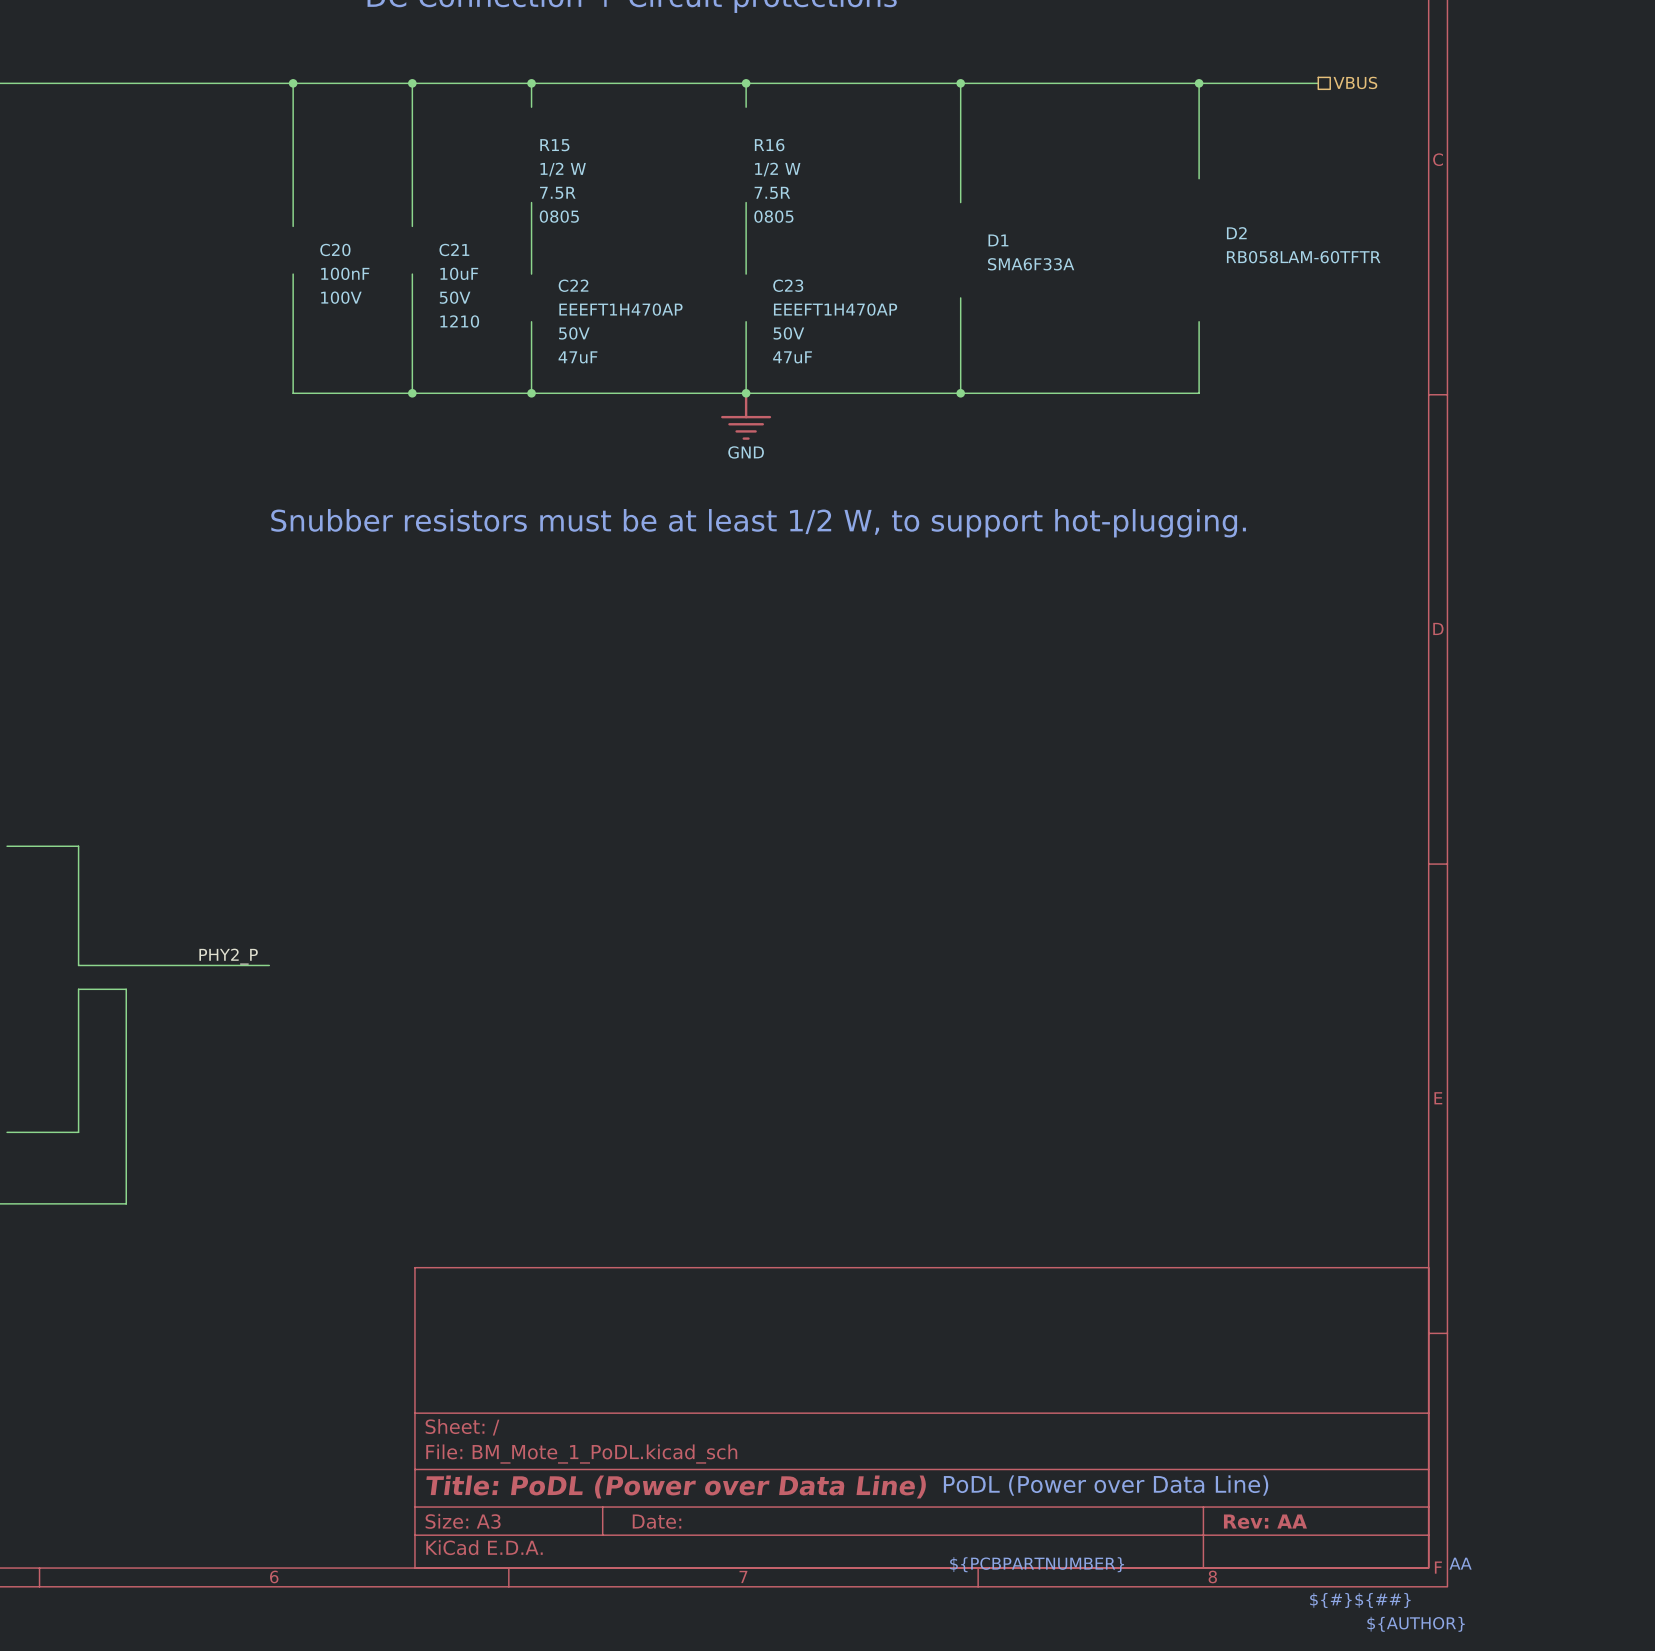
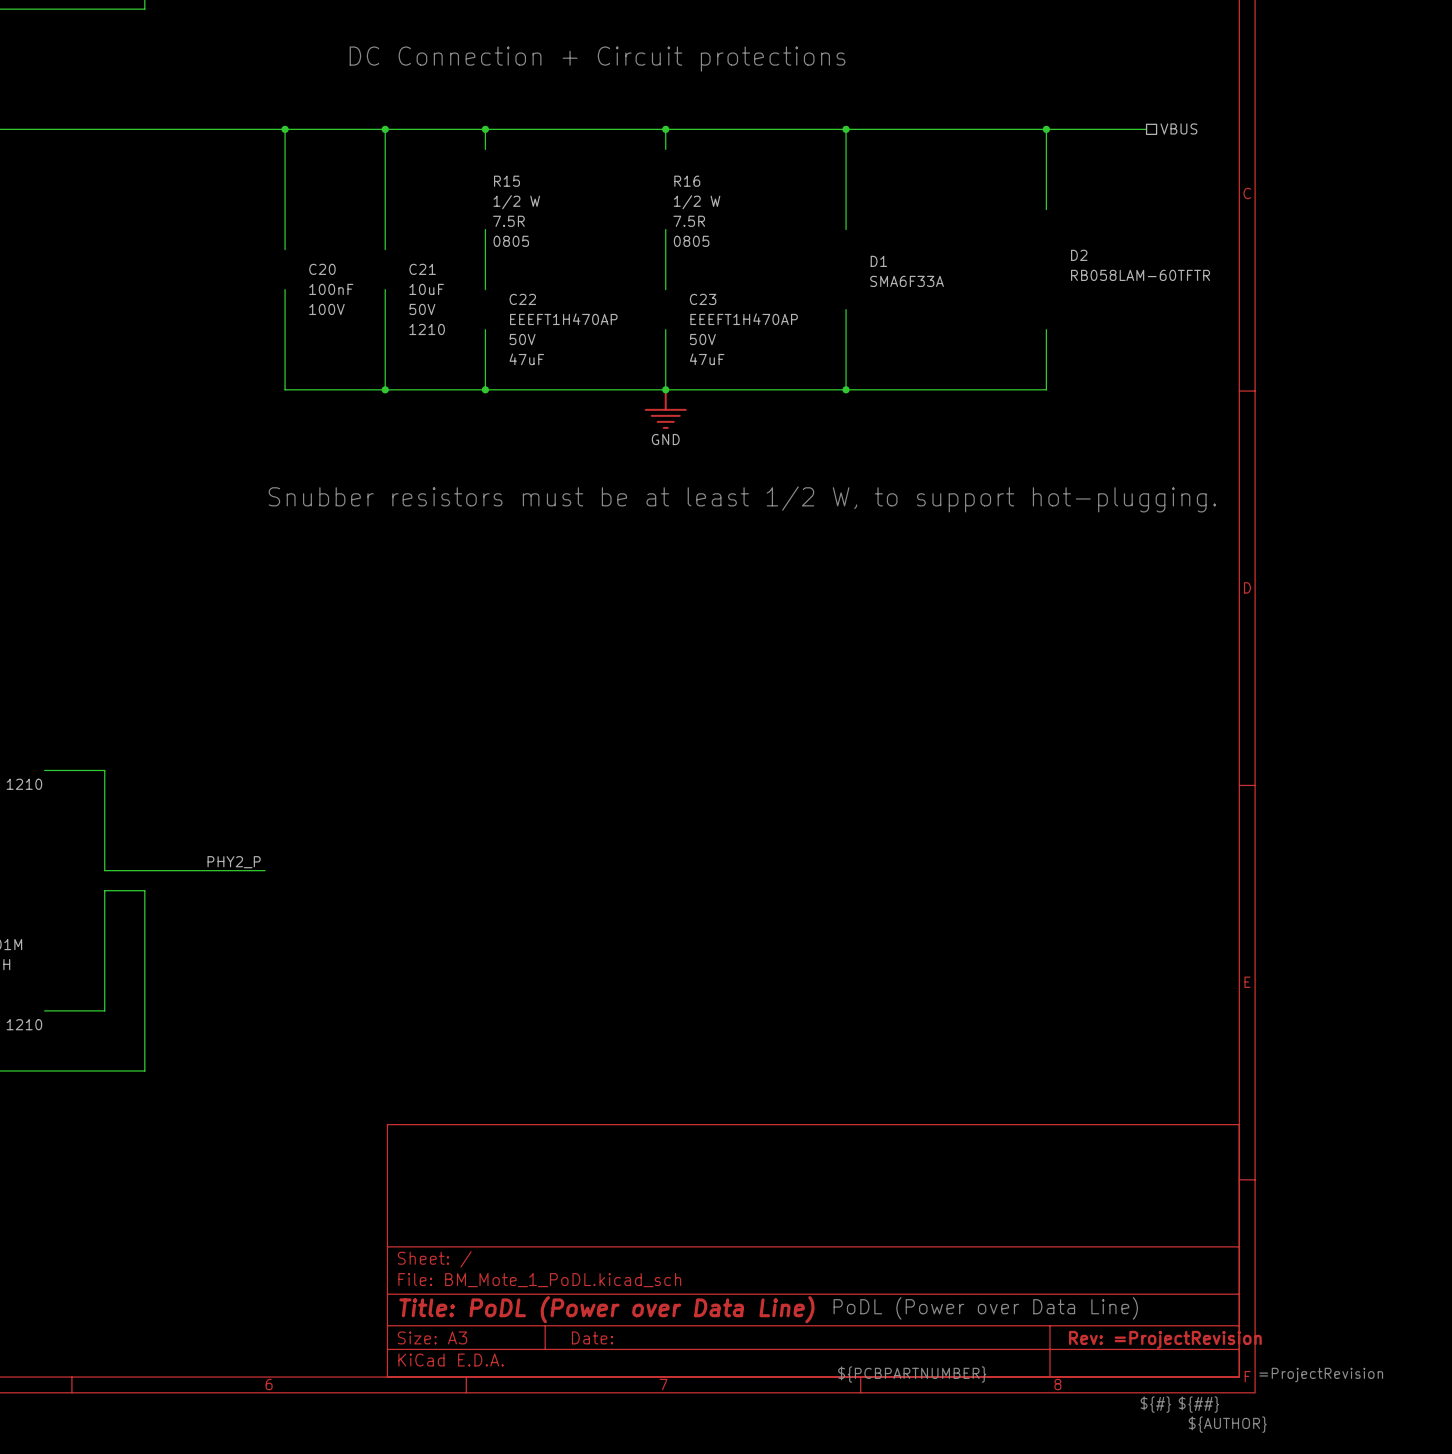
title block: Rev: AA (1265, 1521) -> Rev: =ProjectRevision (1165, 1339)
text: AA (1460, 1563) -> =ProjectRevision (1321, 1375)

